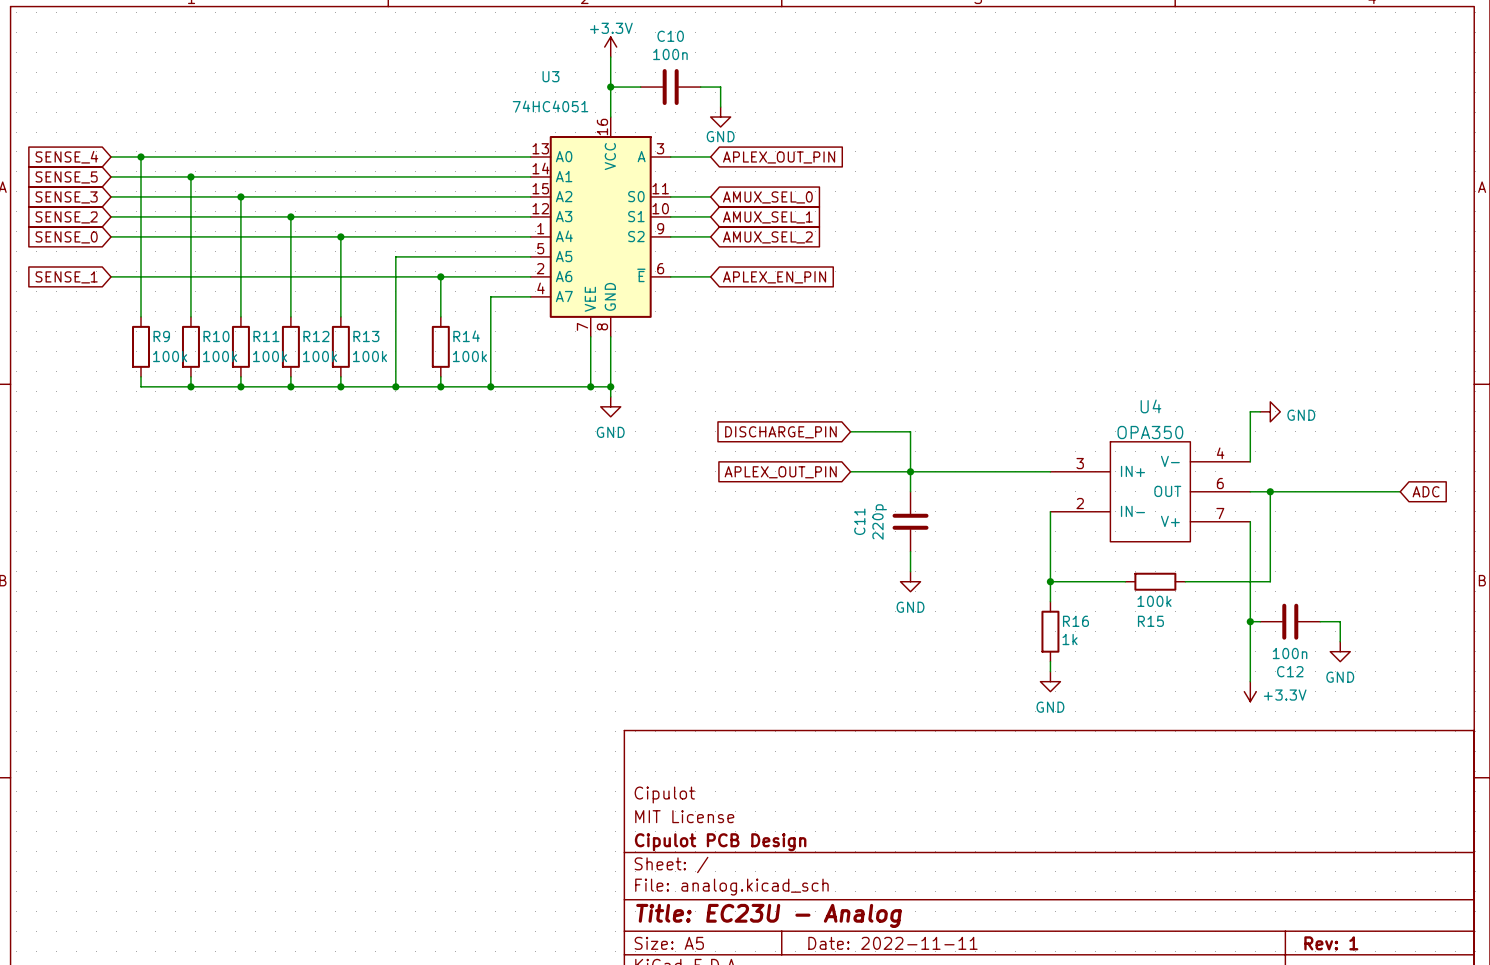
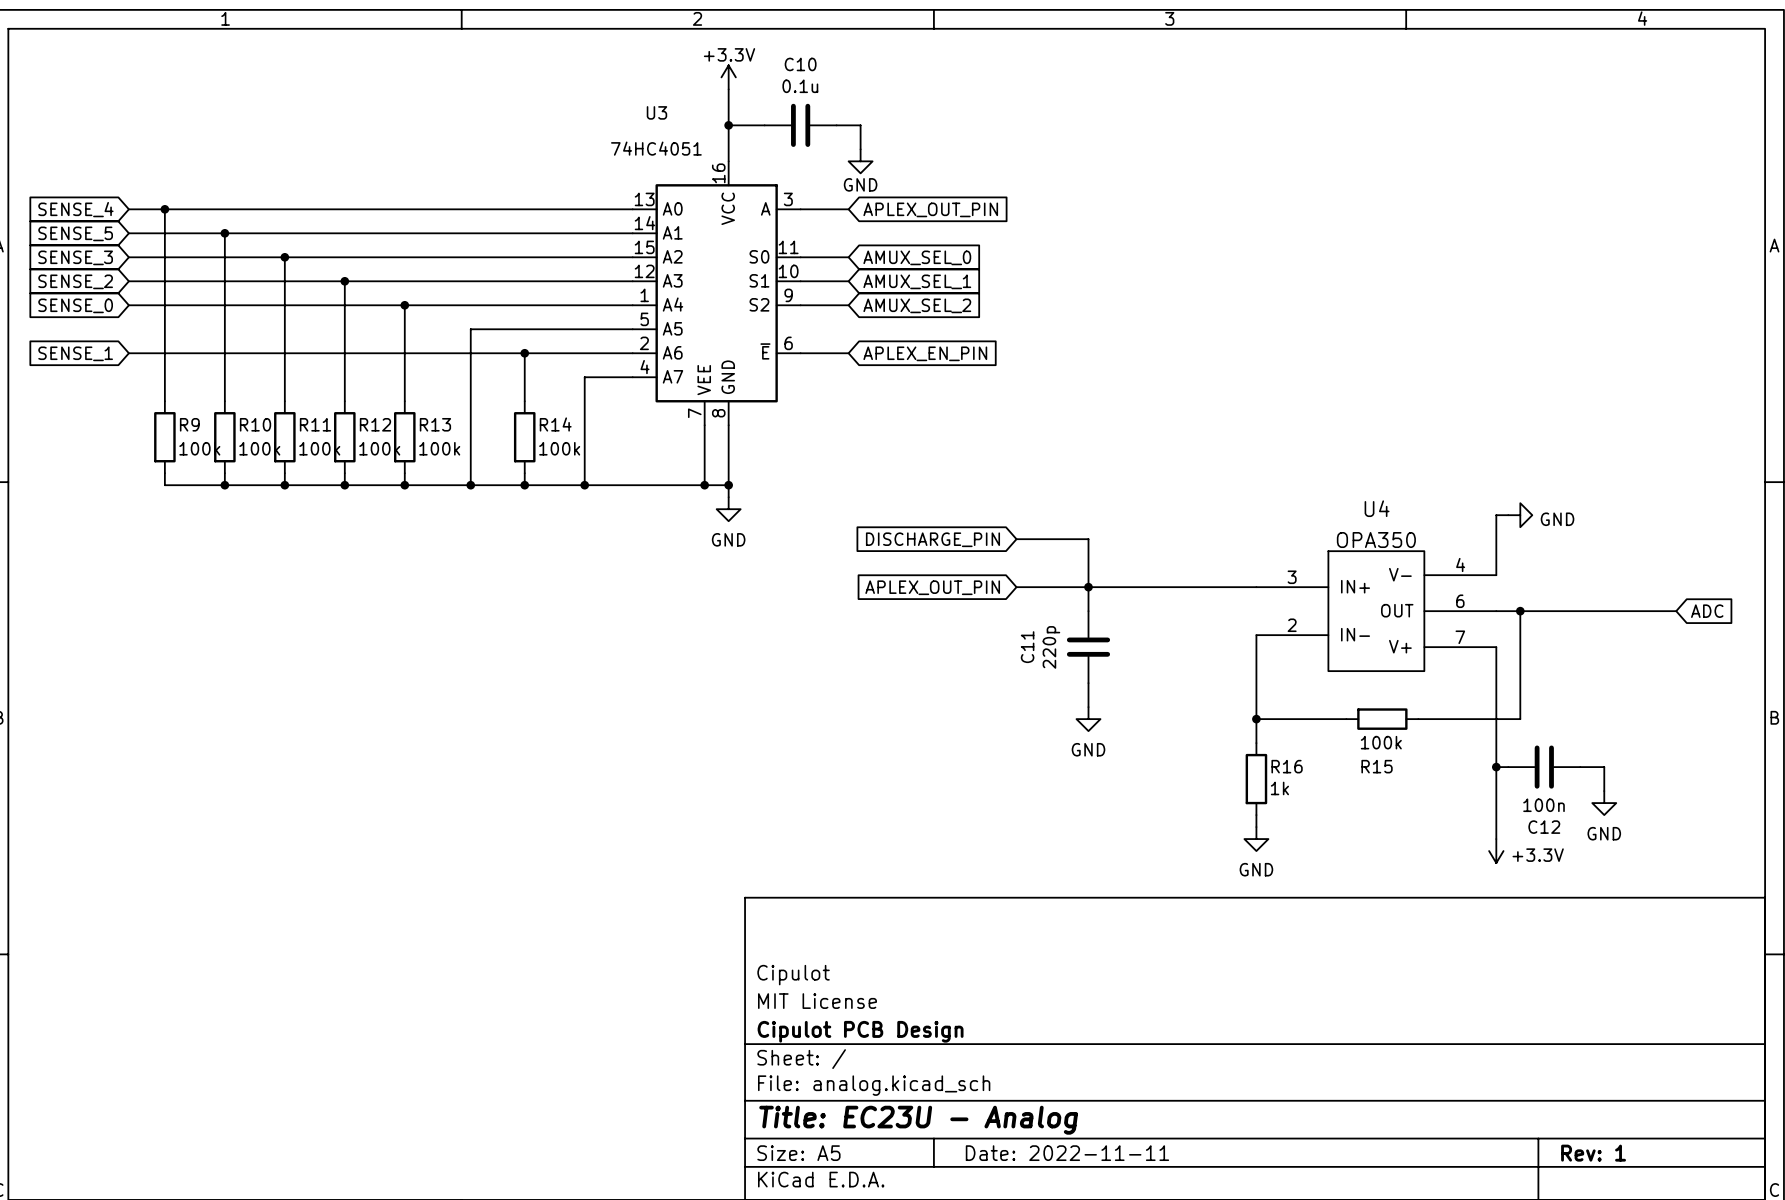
C10 value: 100n (670, 54) -> 0.1u (800, 86)

